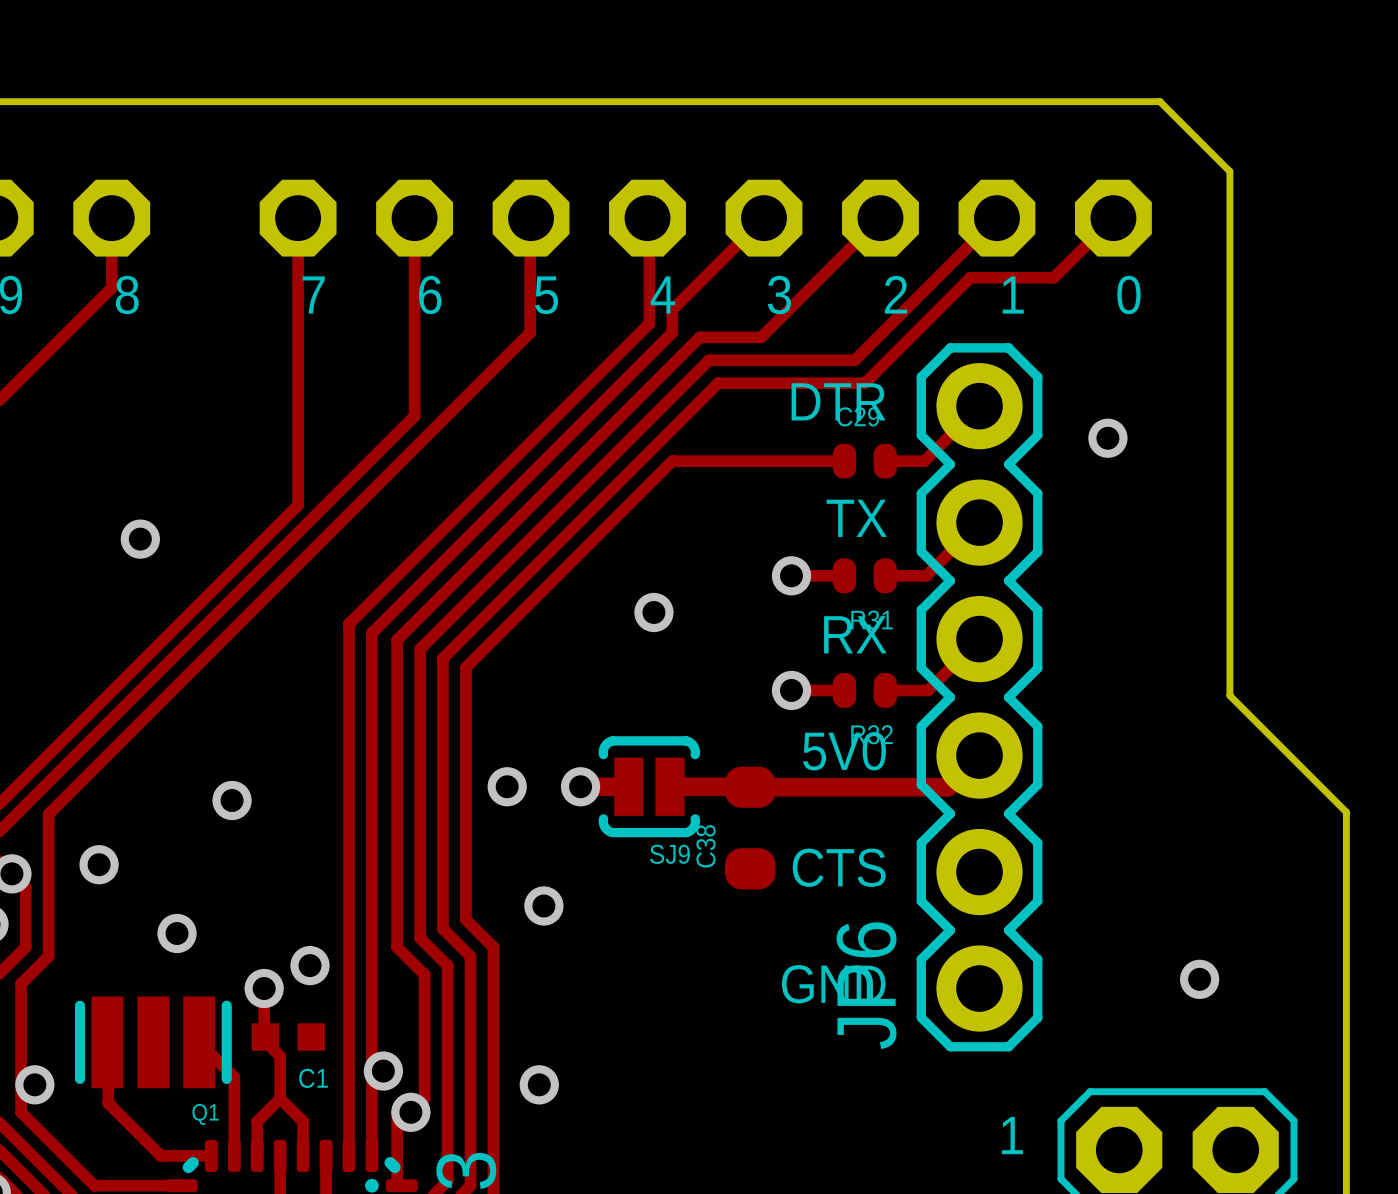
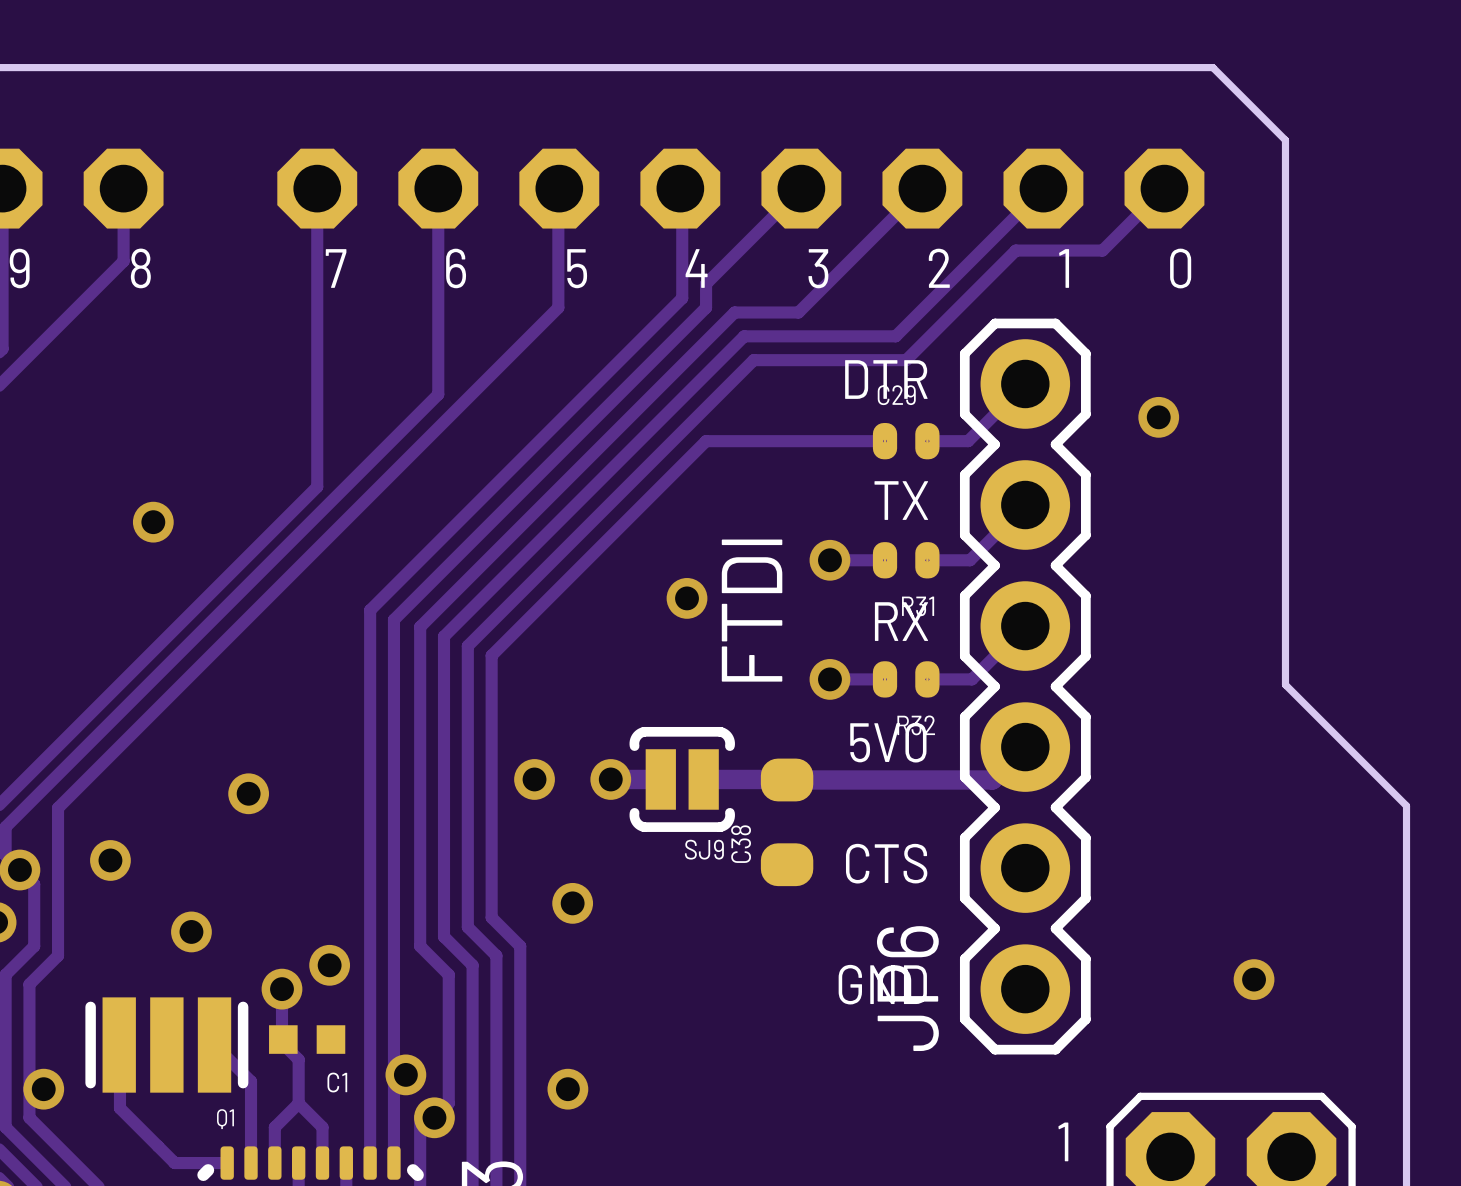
text: none -> FTDI (752, 610)

